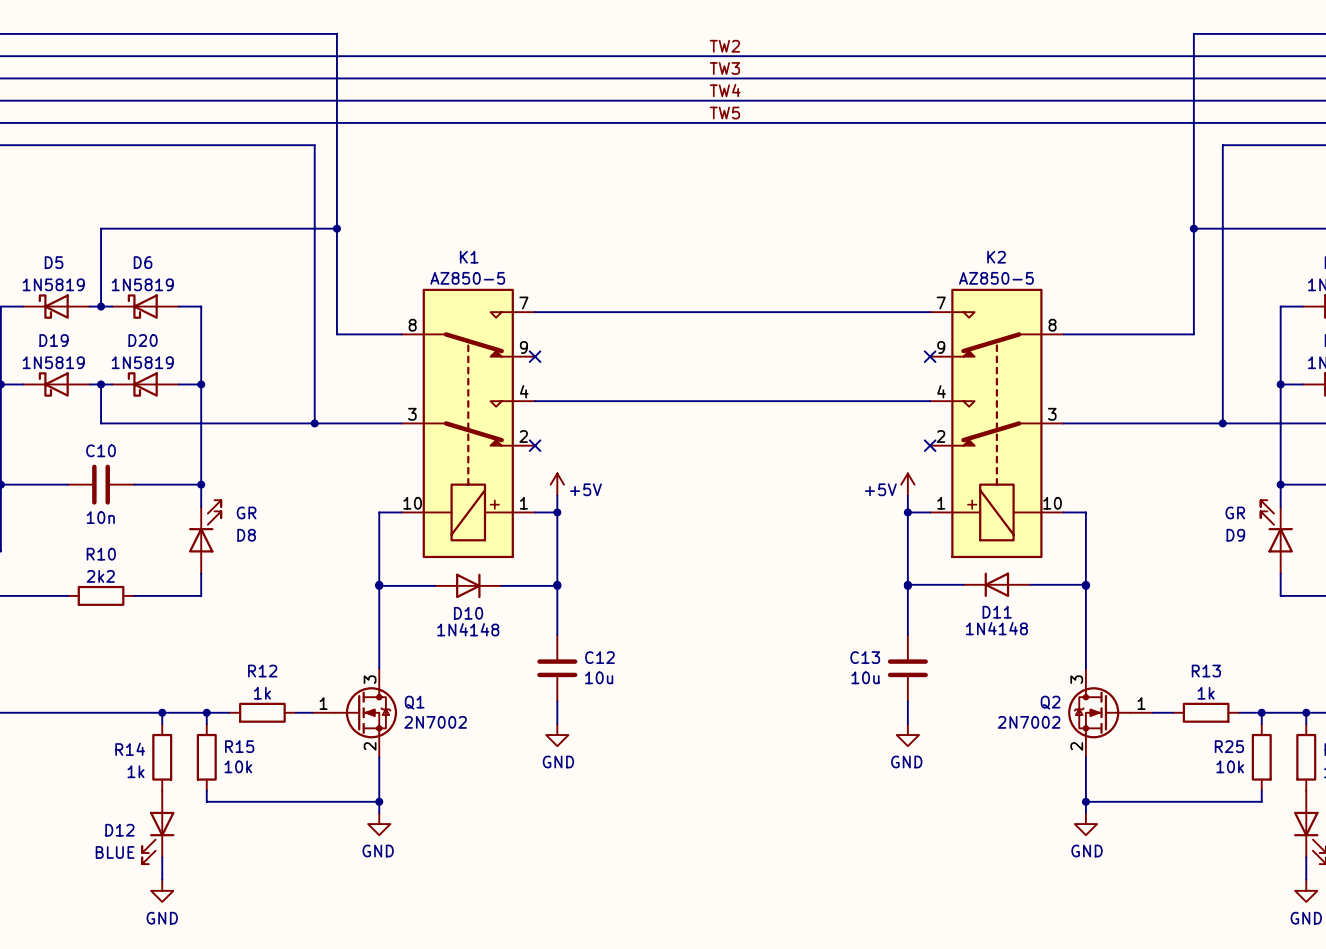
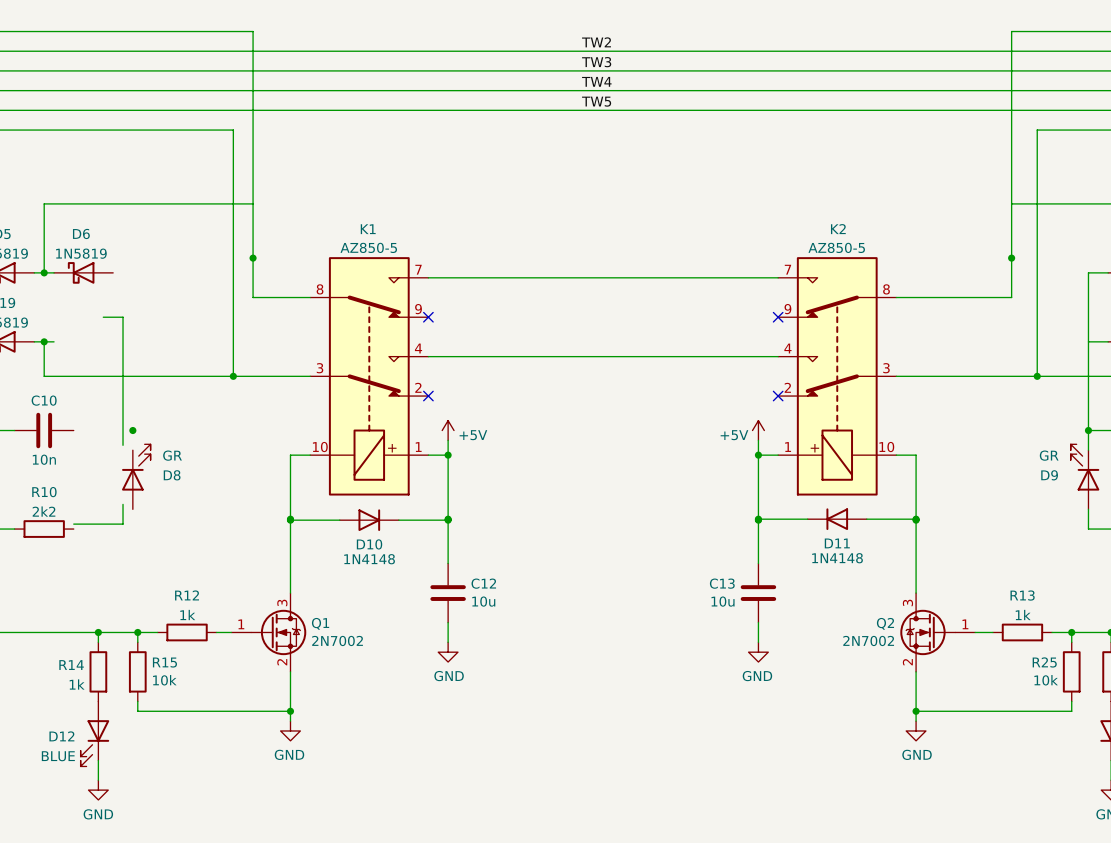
junction: (336, 228) -> none
junction: (1193, 228) -> none
junction: none -> (253, 258)
junction: none -> (1011, 258)
wire: (178, 306) (201, 306) (201, 506) -> none
wire: none -> (103, 317) (123, 317) (123, 445)
D20: 1N5819 (145, 384) -> none
wire: (178, 384) (201, 384) -> none
junction: (201, 384) -> none
junction: (1280, 384) -> none
wire: (134, 484) (201, 484) -> none
wire: none -> (123, 504) (123, 524) (73, 524)
wire: (201, 573) (201, 595) (134, 595) -> none

